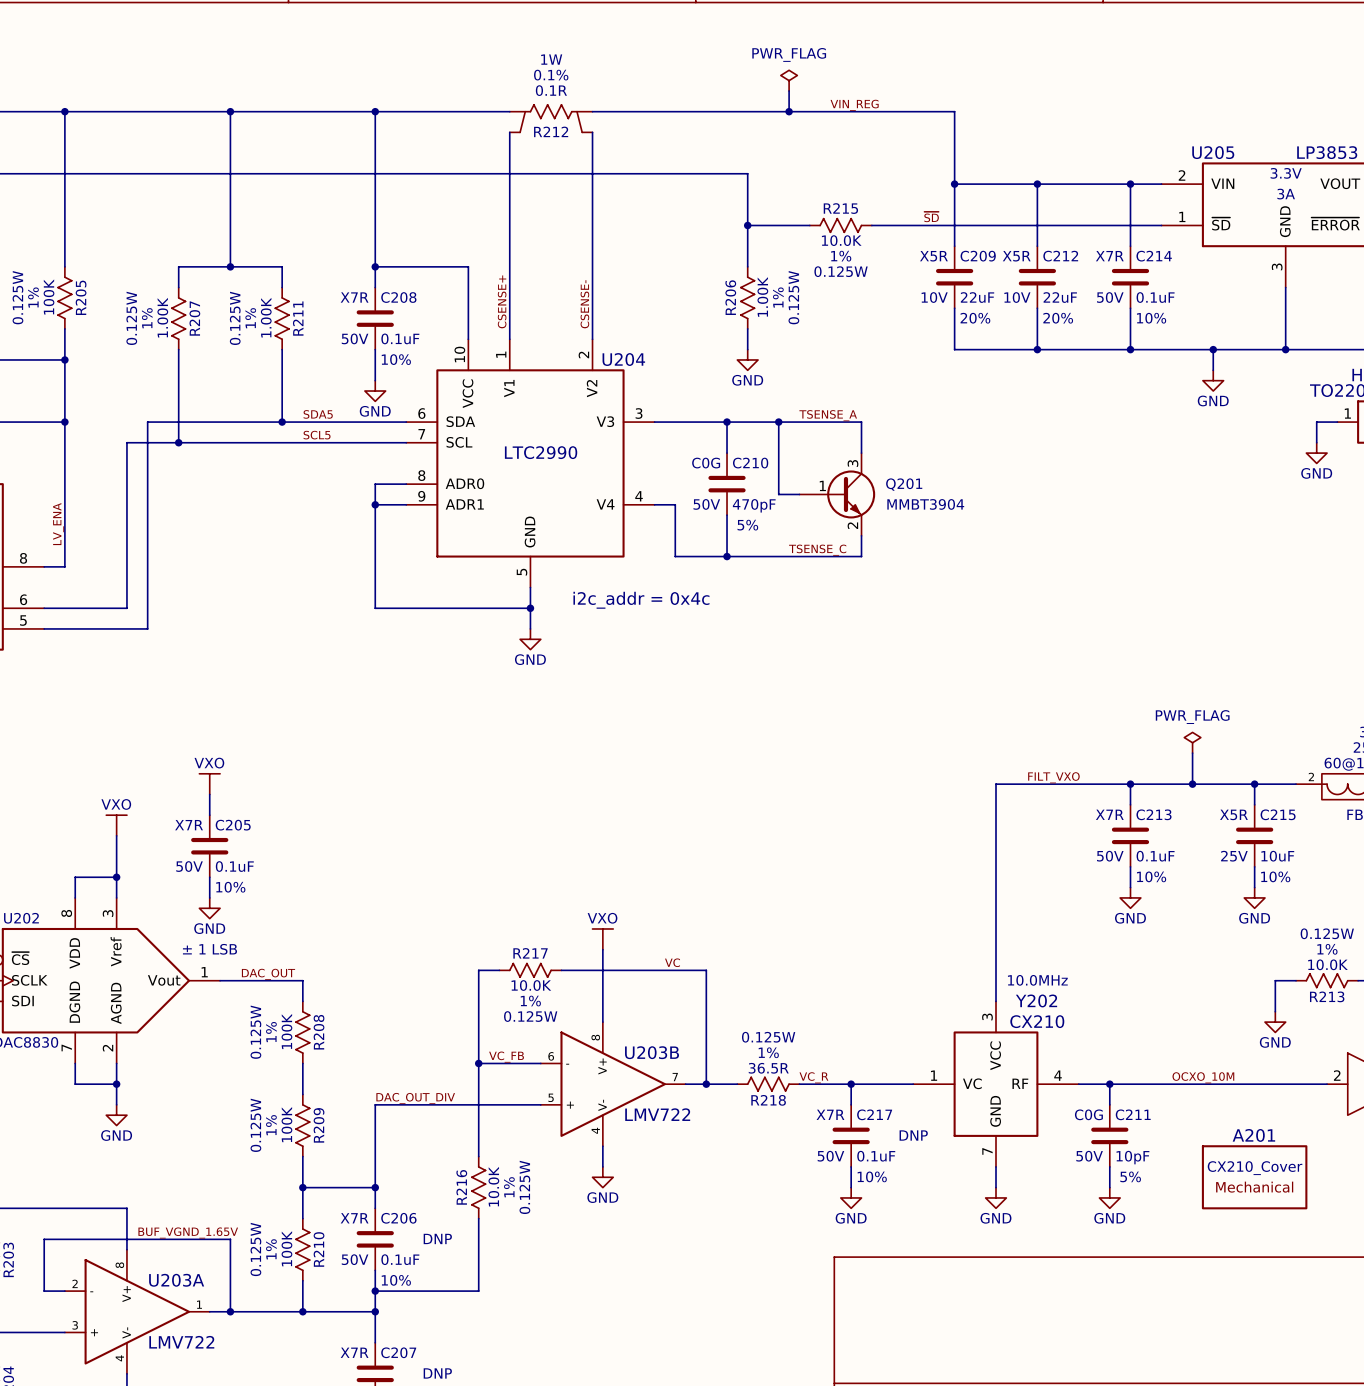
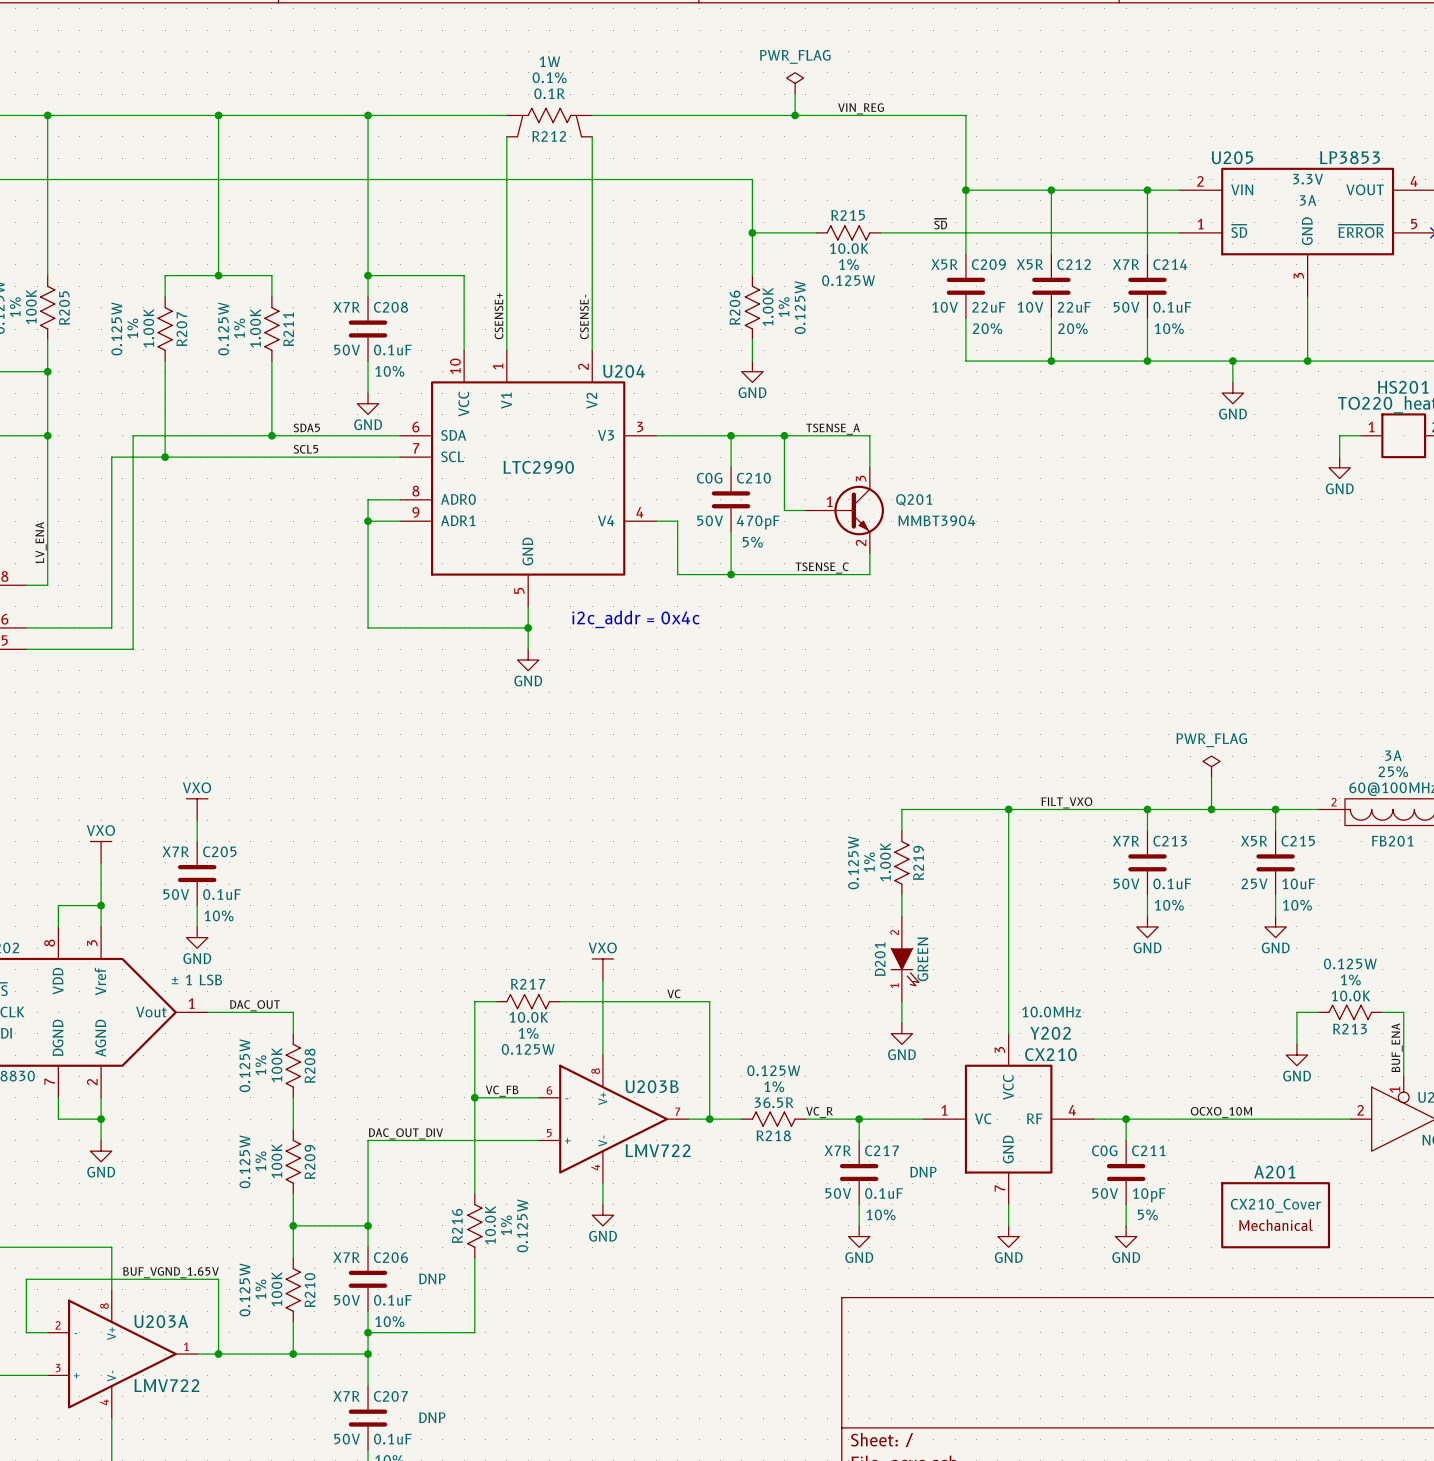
wire: none -> (1008, 809) (901, 809) (901, 830)
junction: none -> (1008, 809)
R219: none -> 1.00K (901, 862)
wire: none -> (901, 894) (901, 916)
D201: none -> GREEN (905, 958)
wire: none -> (901, 1001) (901, 1023)
power symbol: none -> GND (901, 1033)

